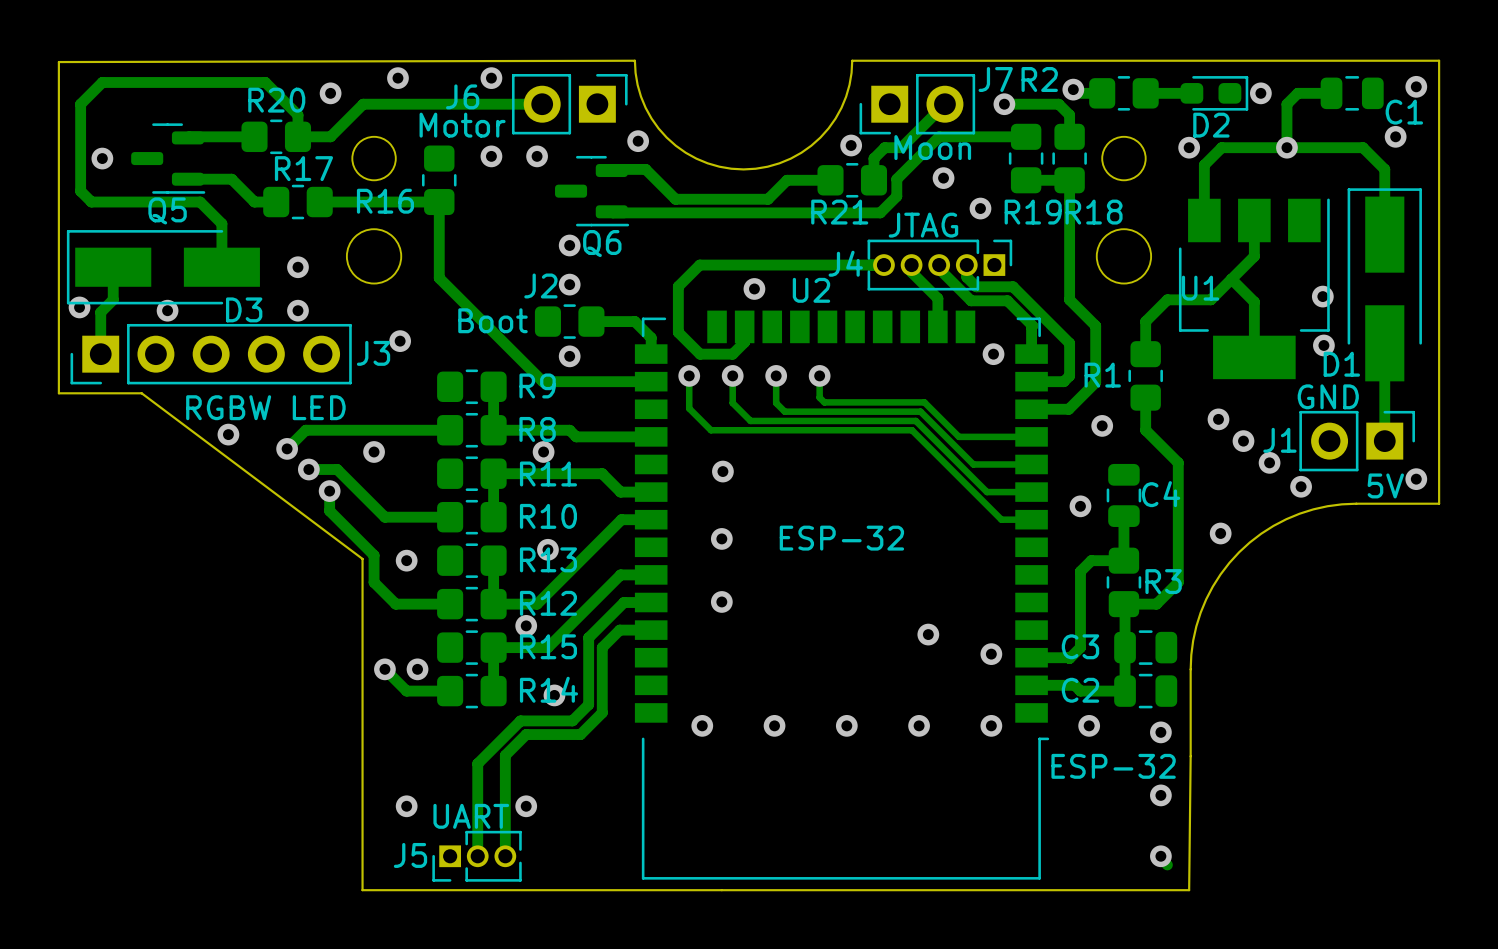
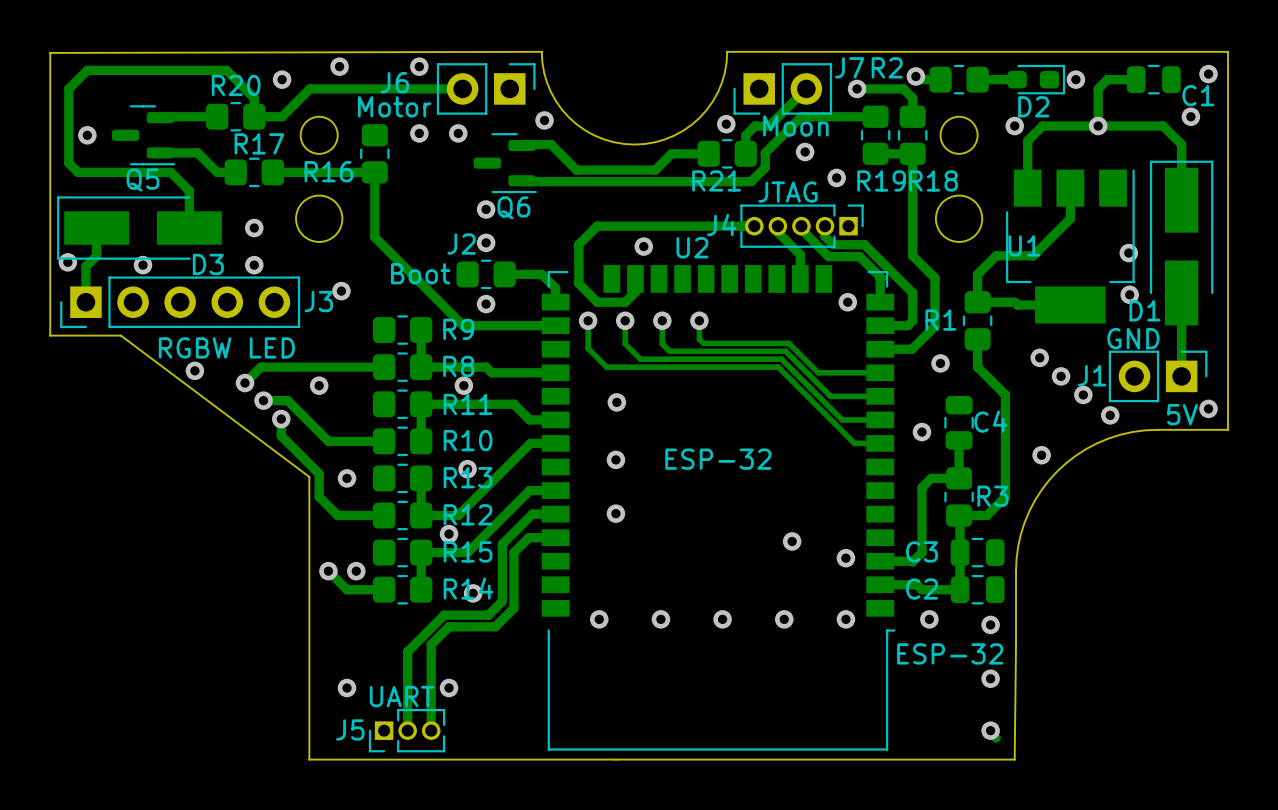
track: (1231, 279) (1254, 302) (1254, 357) -> (977, 302) (1014, 302) (1017, 305) (1070, 305)

